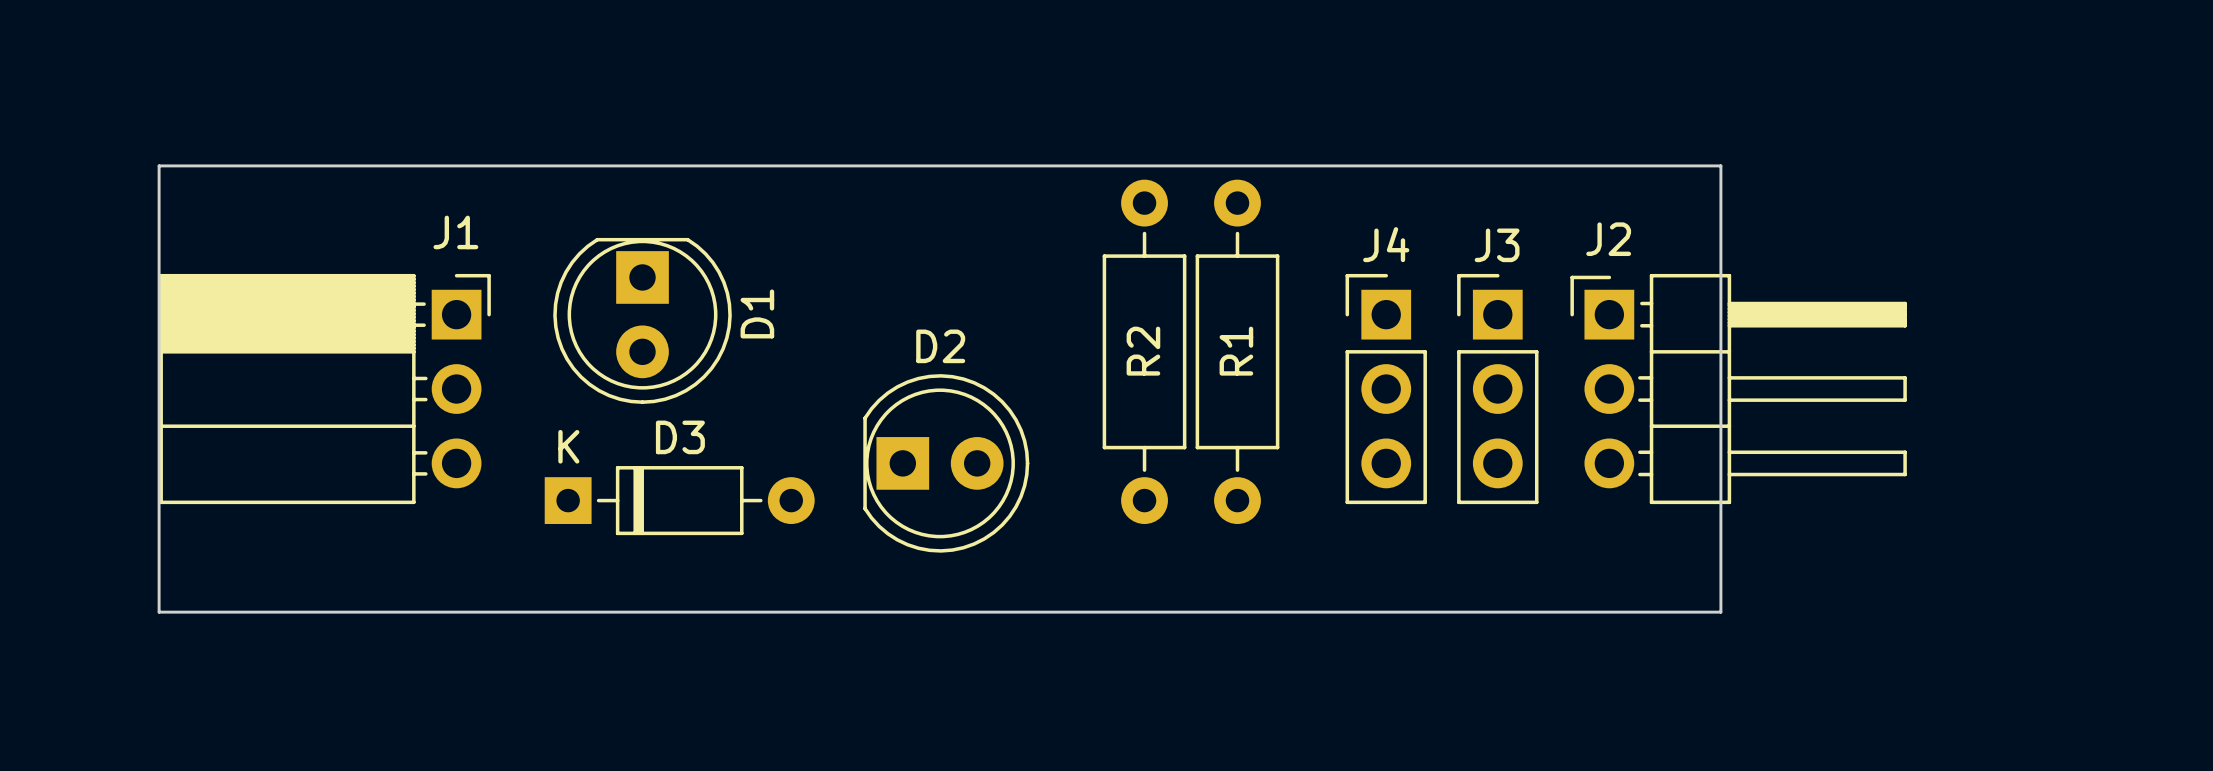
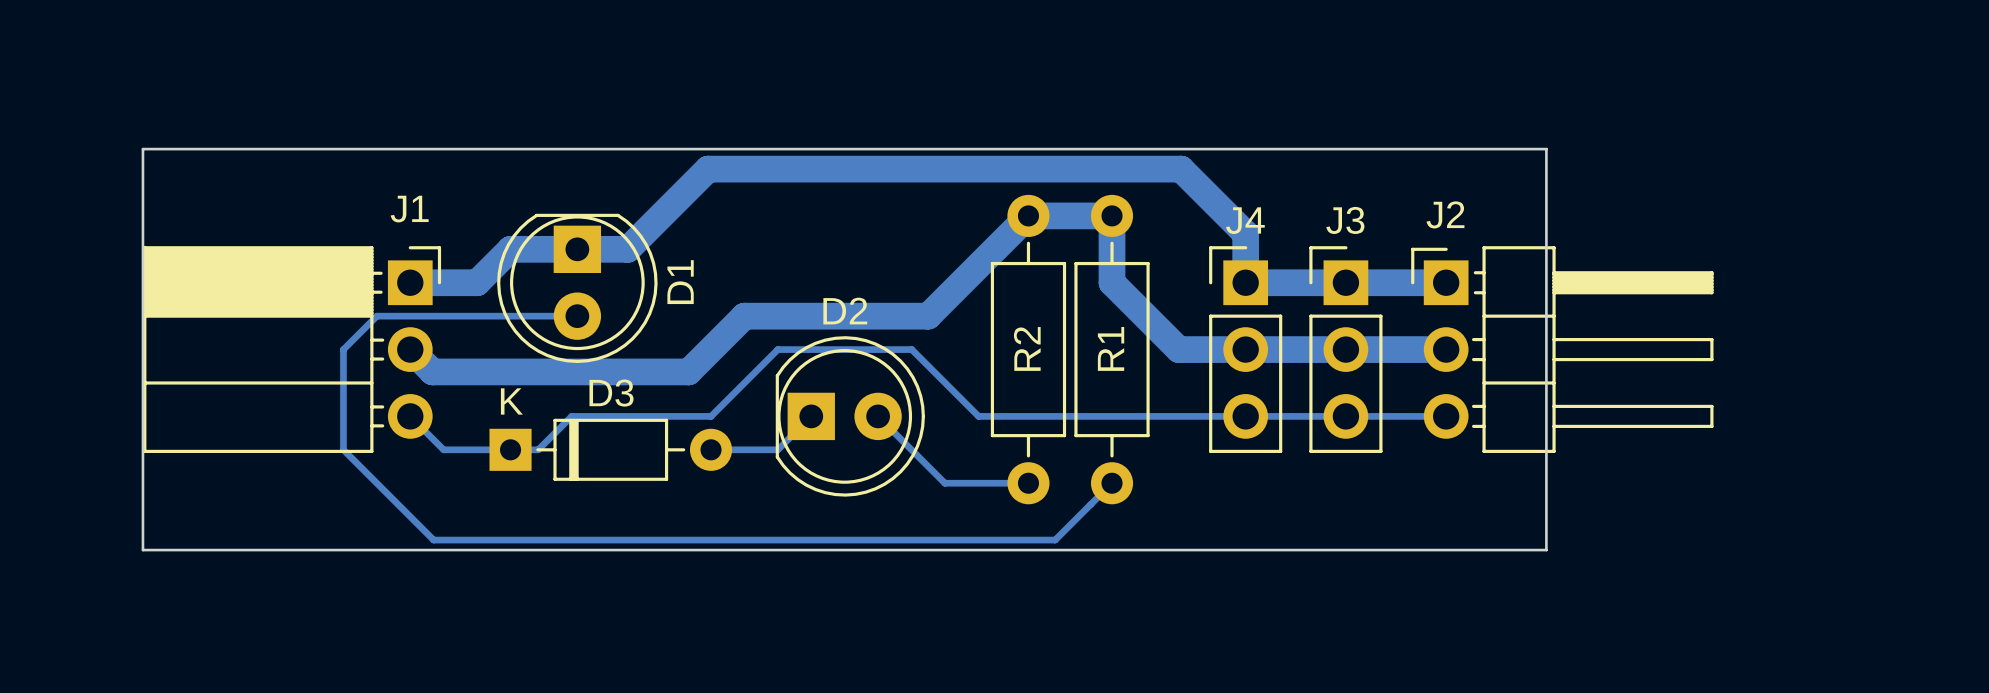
bottom track: none -> (410, 282) (477, 282) (510, 249) (627, 249) (707, 169) (1181, 169) (1245, 233) (1245, 282) (1446, 282)
bottom track: none -> (577, 316) (376, 316) (343, 349) (343, 449) (433, 540) (1055, 540) (1112, 483)
R2 position: (1144, 351) -> (1028, 349)
R1 position: (1237, 351) -> (1112, 349)
bottom track: none -> (410, 349) (432, 371) (688, 371) (744, 316) (928, 316) (1028, 215) (1112, 215) (1112, 282) (1178, 349) (1446, 349)
bottom track: none -> (410, 416) (443, 449) (538, 449) (571, 416) (711, 416) (777, 349) (911, 349) (978, 416) (1446, 416)
bottom track: none -> (811, 416) (777, 449) (711, 449)
bottom track: none -> (878, 416) (944, 483) (1028, 483)

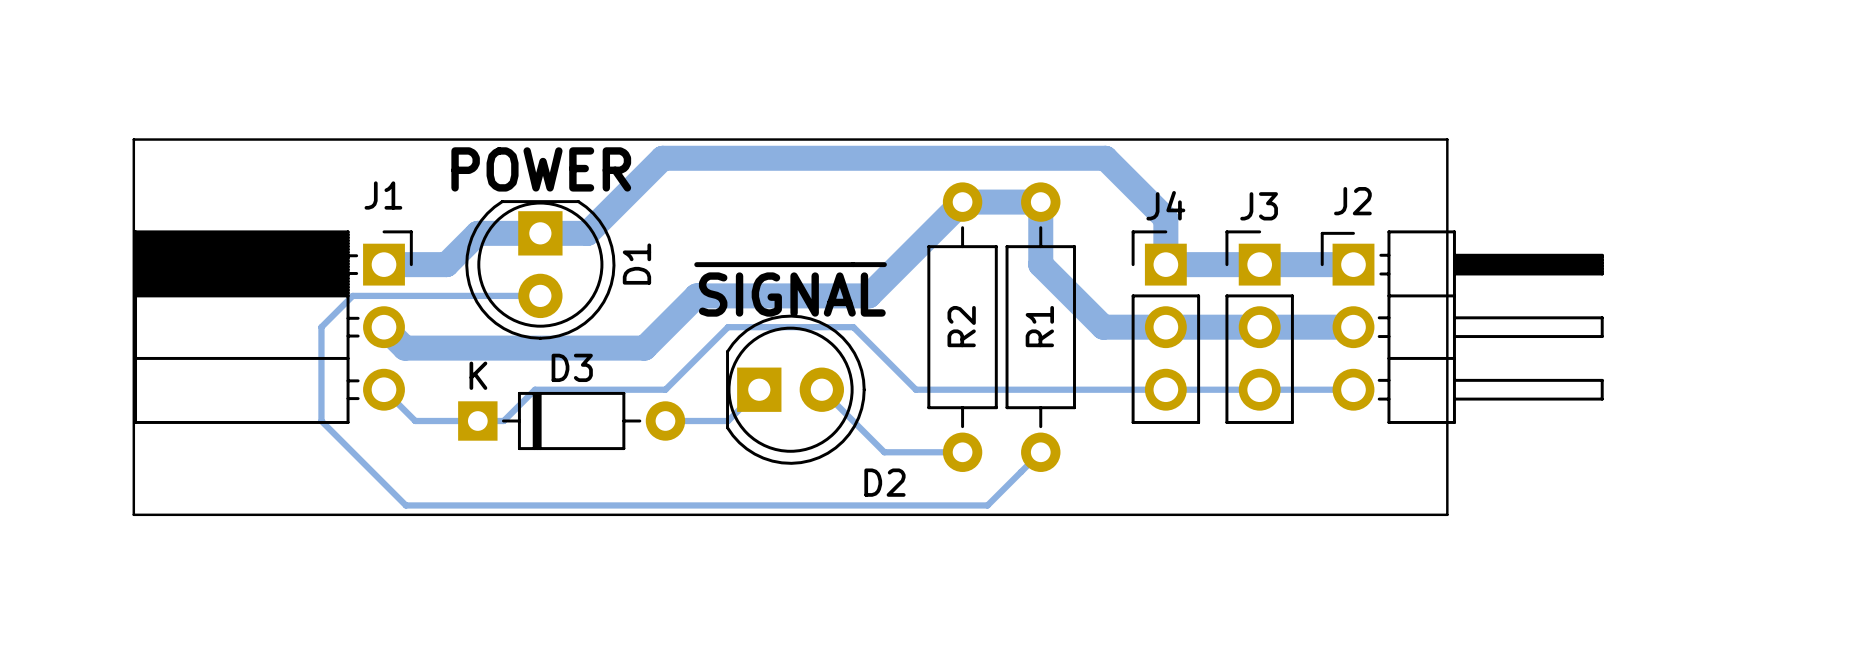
text: none -> POWER (541, 169)
line: none -> (696, 264) (884, 264)
D2 name position: D2 (845, 311) -> D2 (884, 482)
text: none -> SIGNAL (792, 294)

